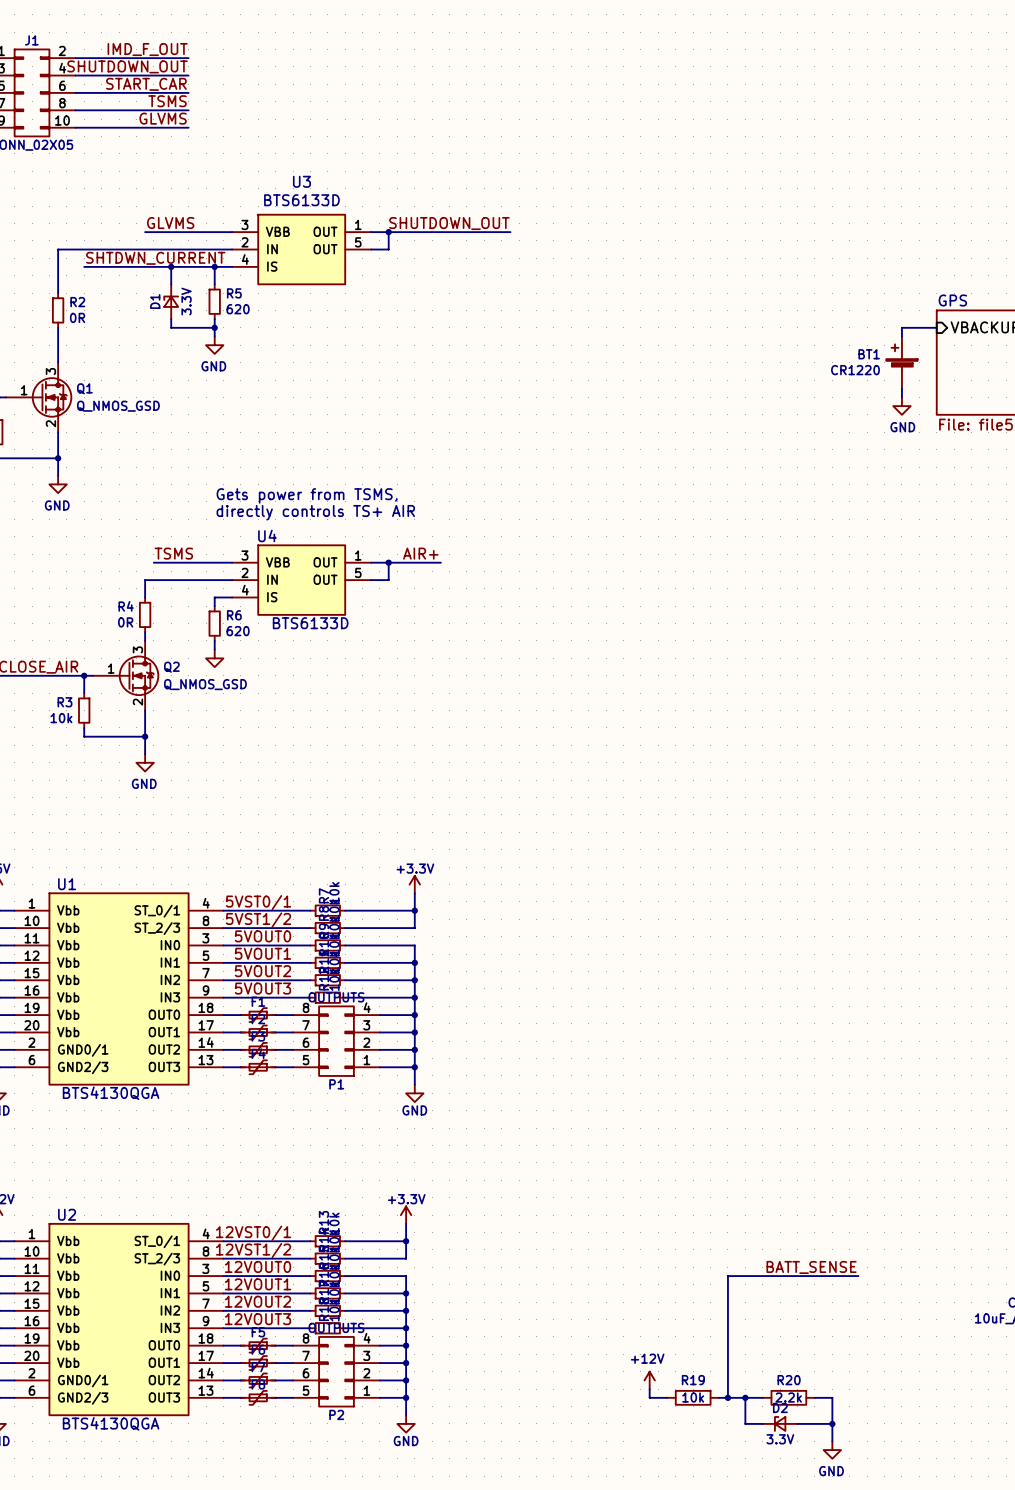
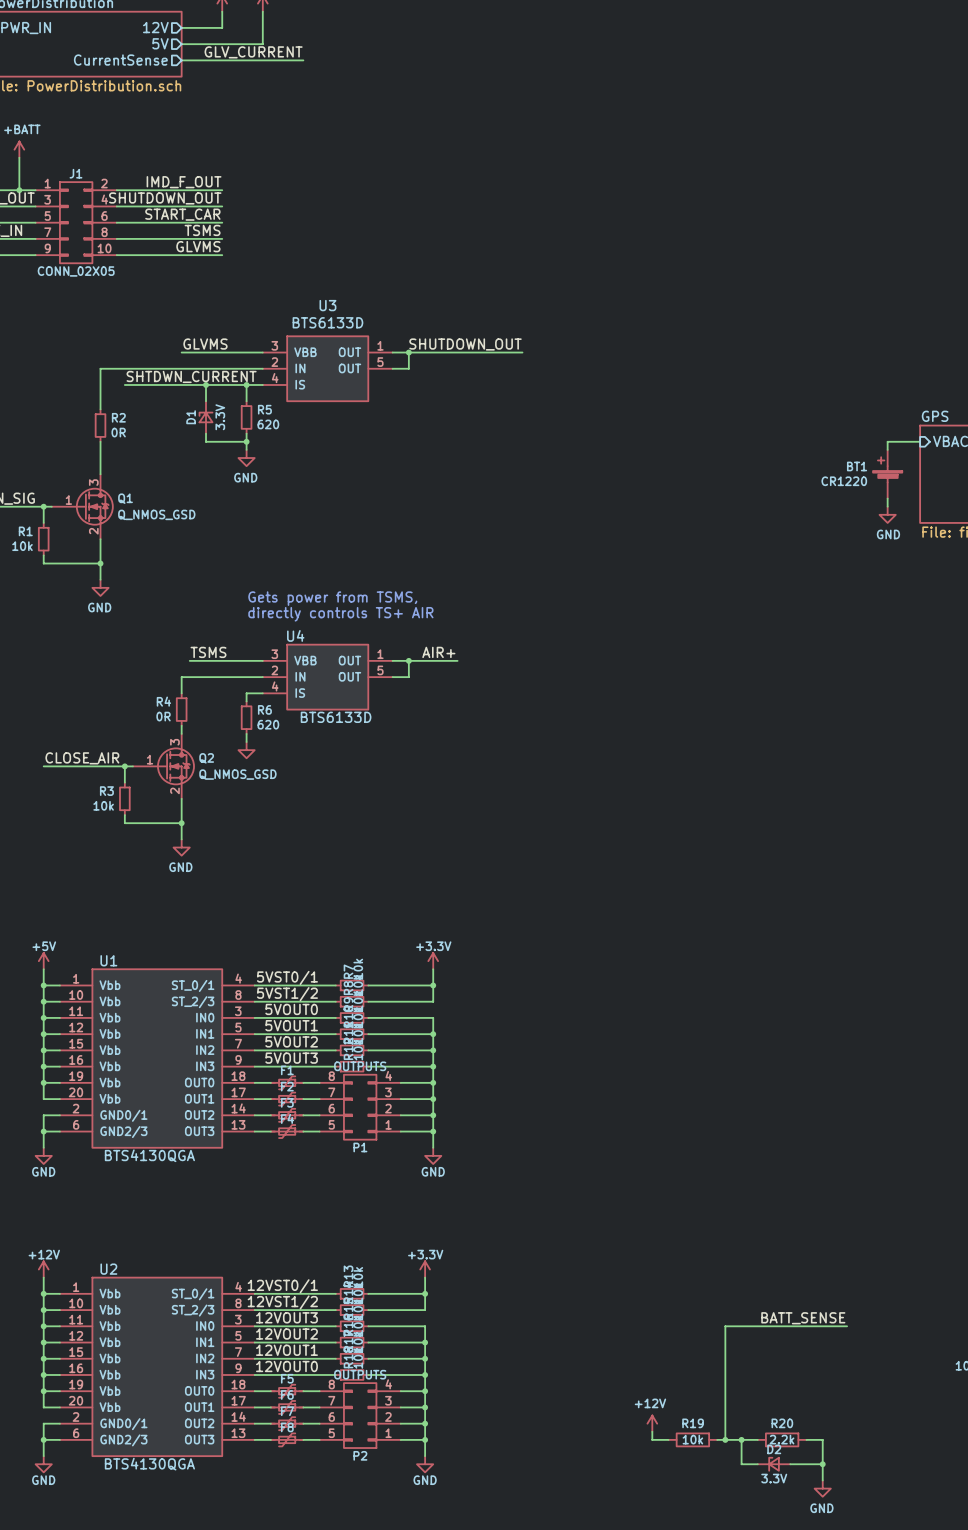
label: 12VOUT0 (258, 1266) -> 12VOUT3 (286, 1317)
label: 12VOUT1 (258, 1284) -> 12VOUT2 (286, 1334)
label: 12VOUT2 (258, 1301) -> 12VOUT1 (286, 1350)
label: 12VOUT3 (258, 1319) -> 12VOUT0 (286, 1366)

